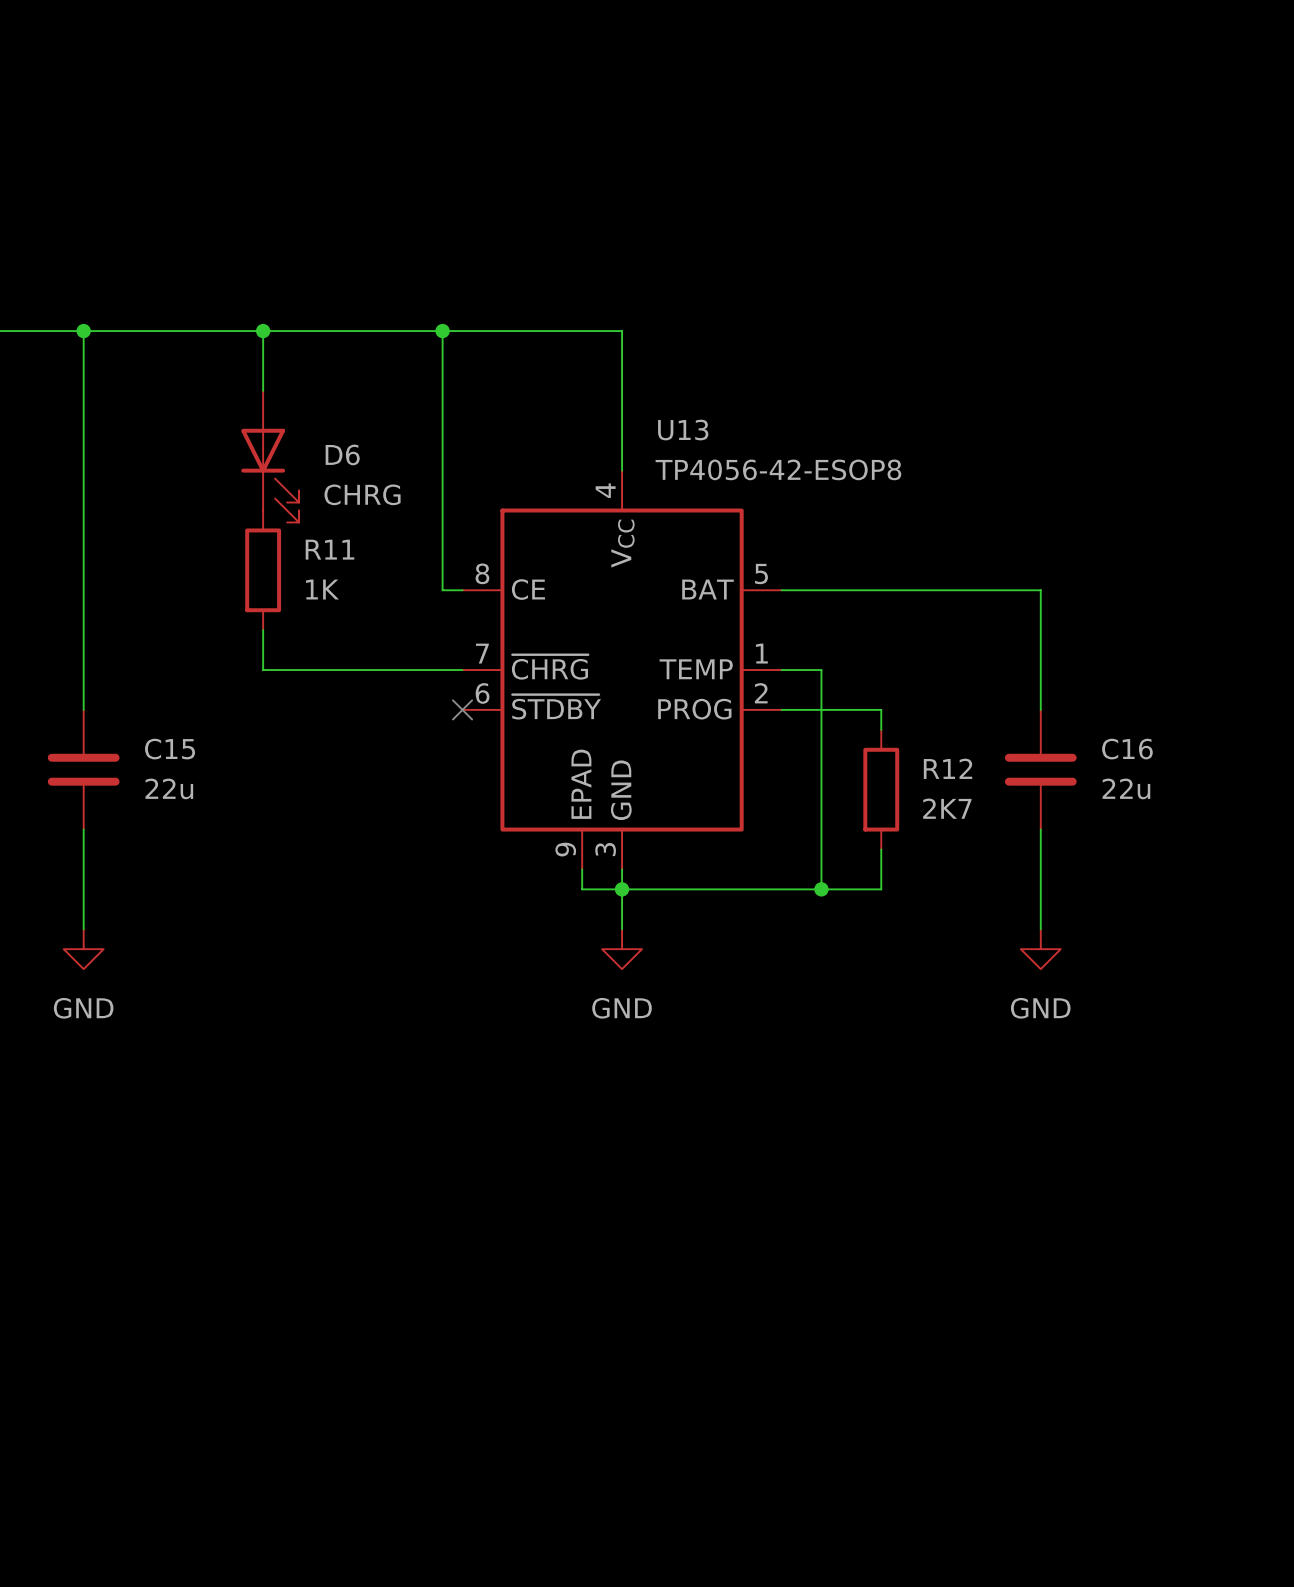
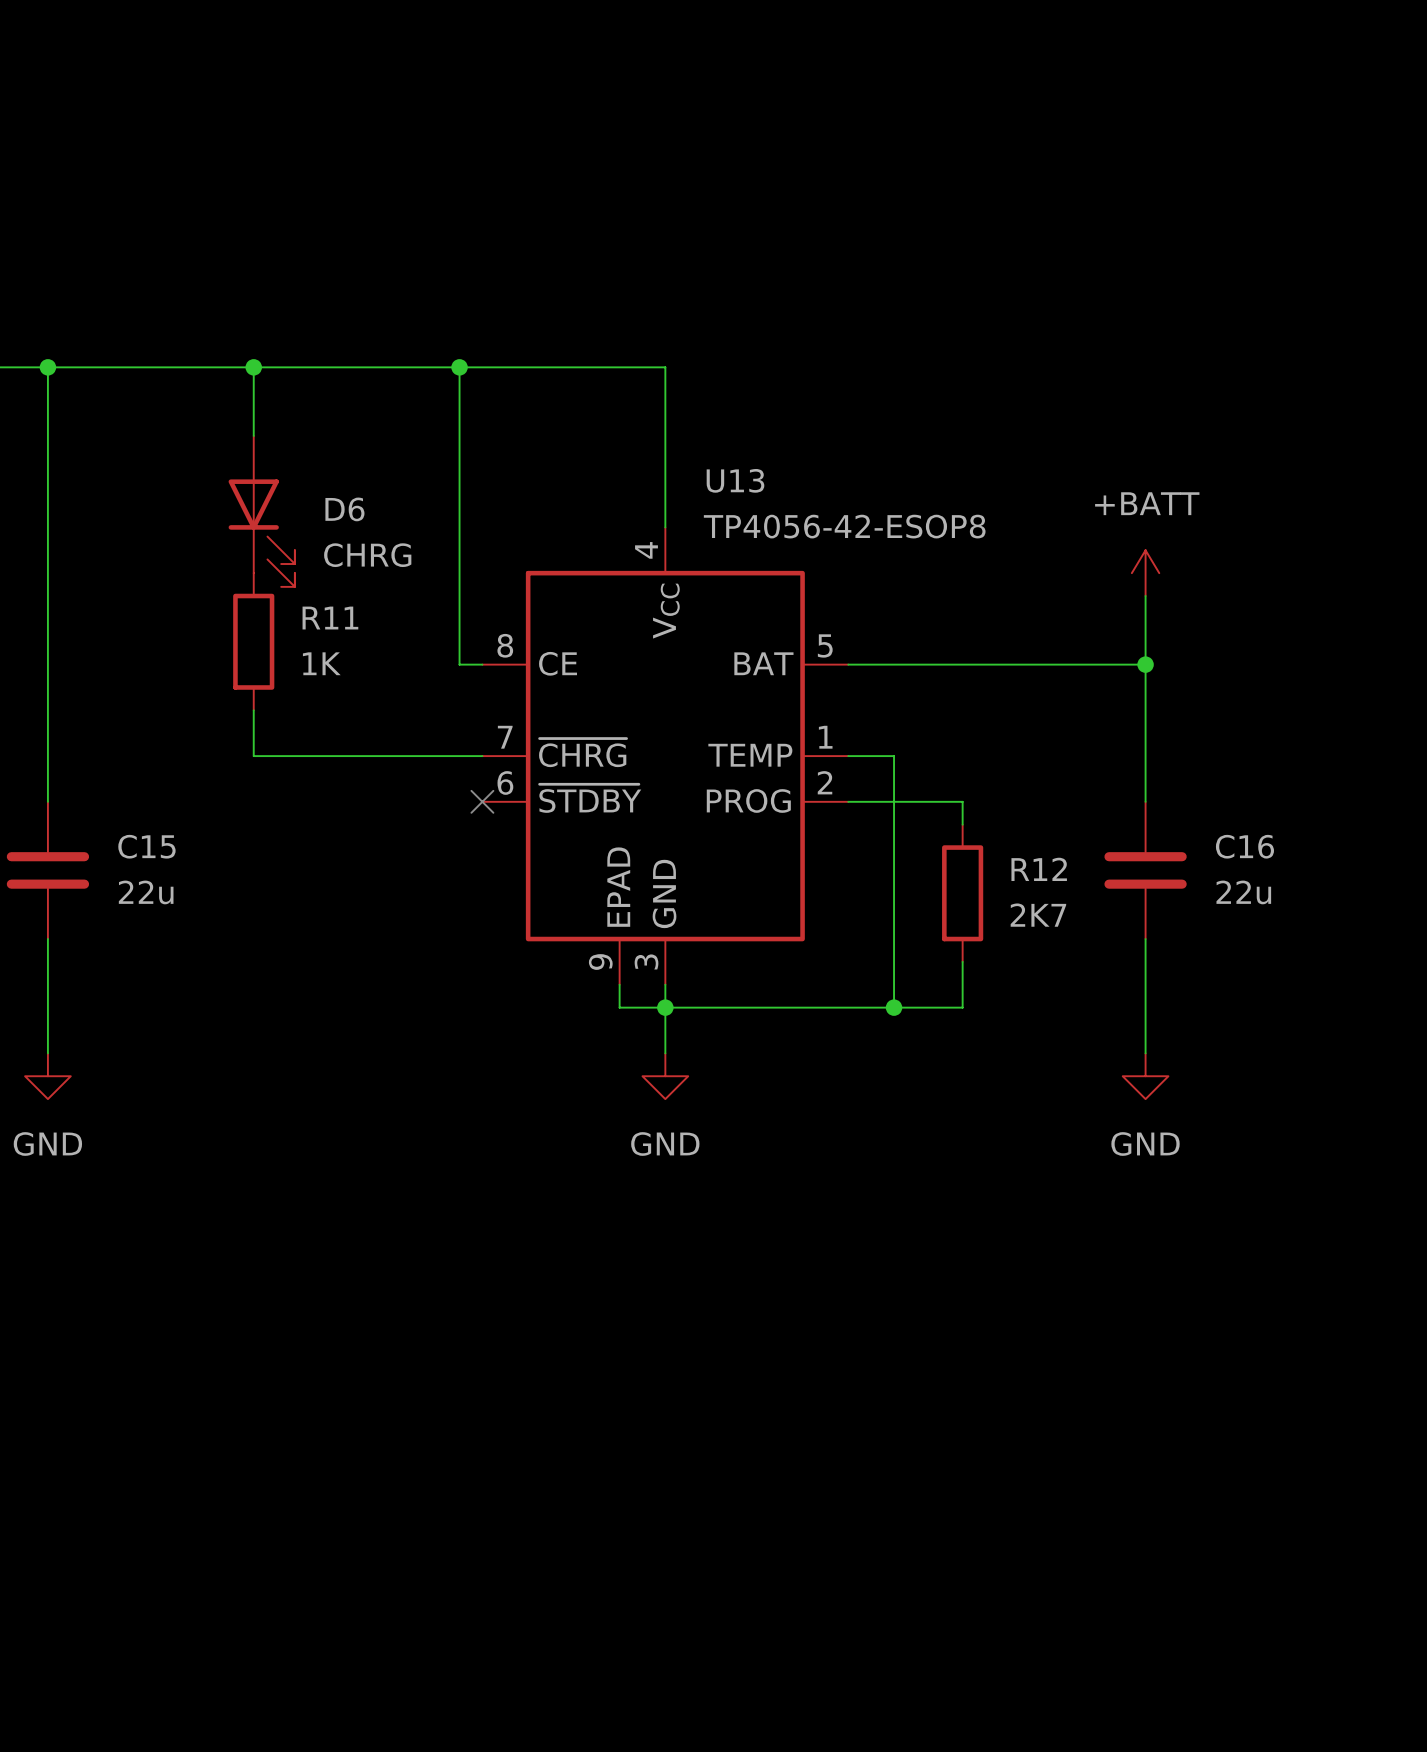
power symbol: none -> +BATT (1145, 573)
wire: none -> (1145, 596) (1145, 664)
junction: none -> (1145, 664)

